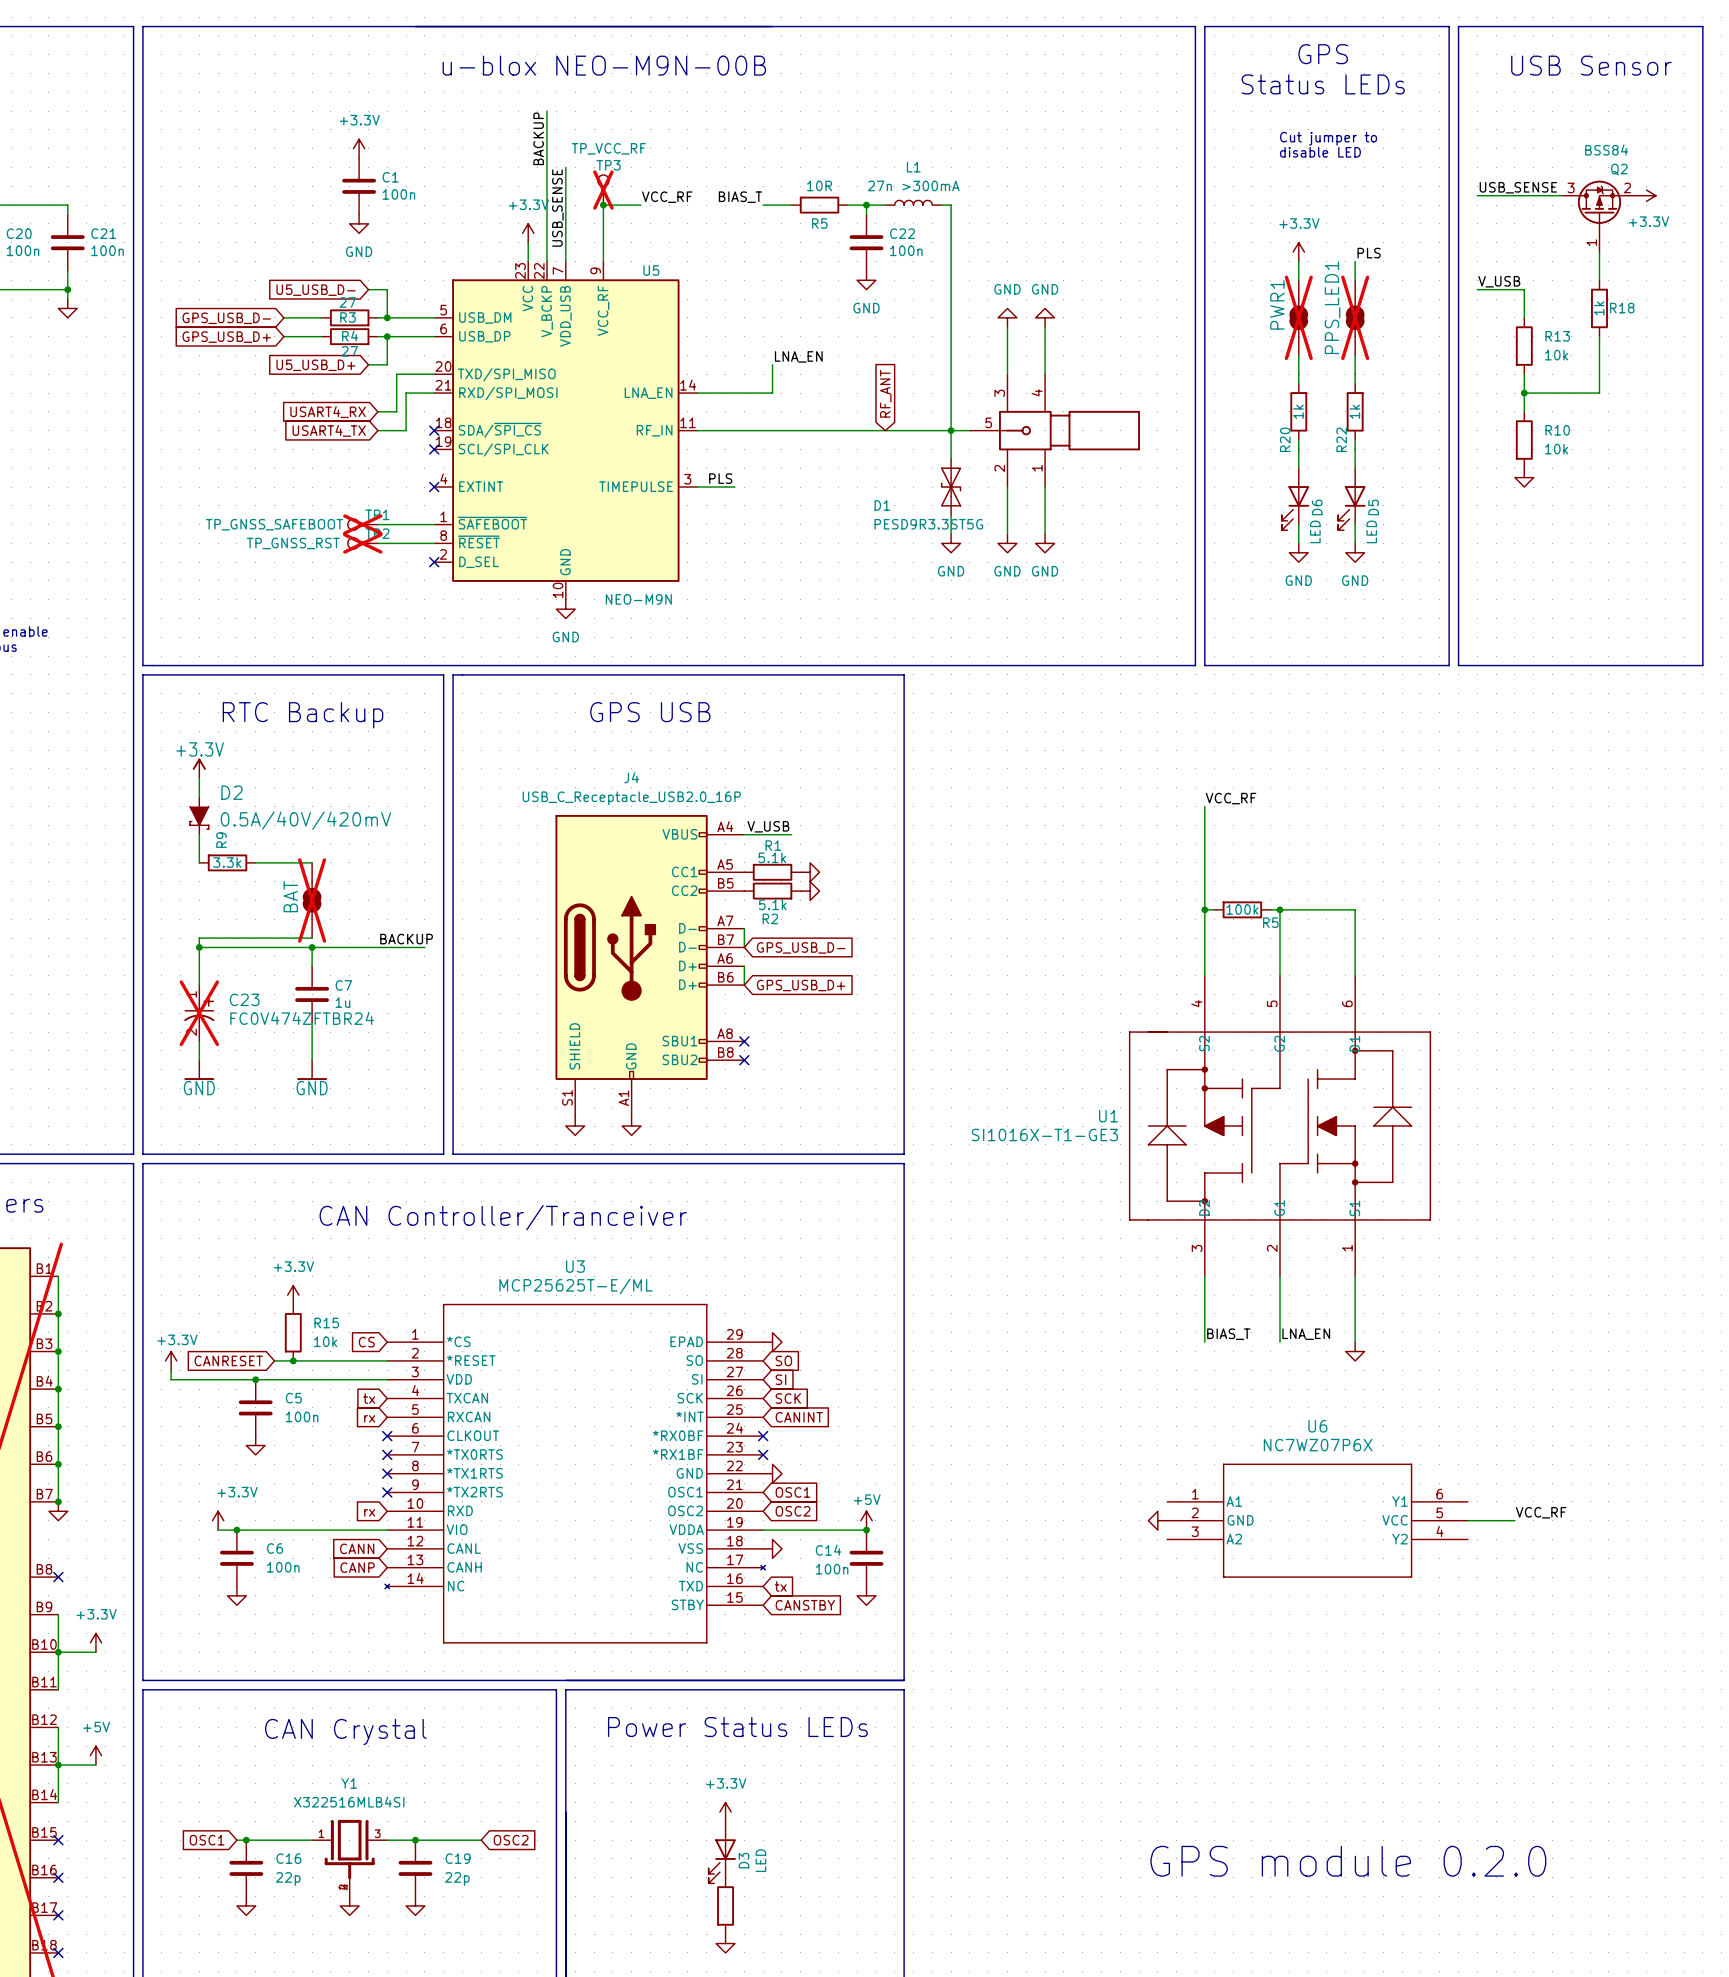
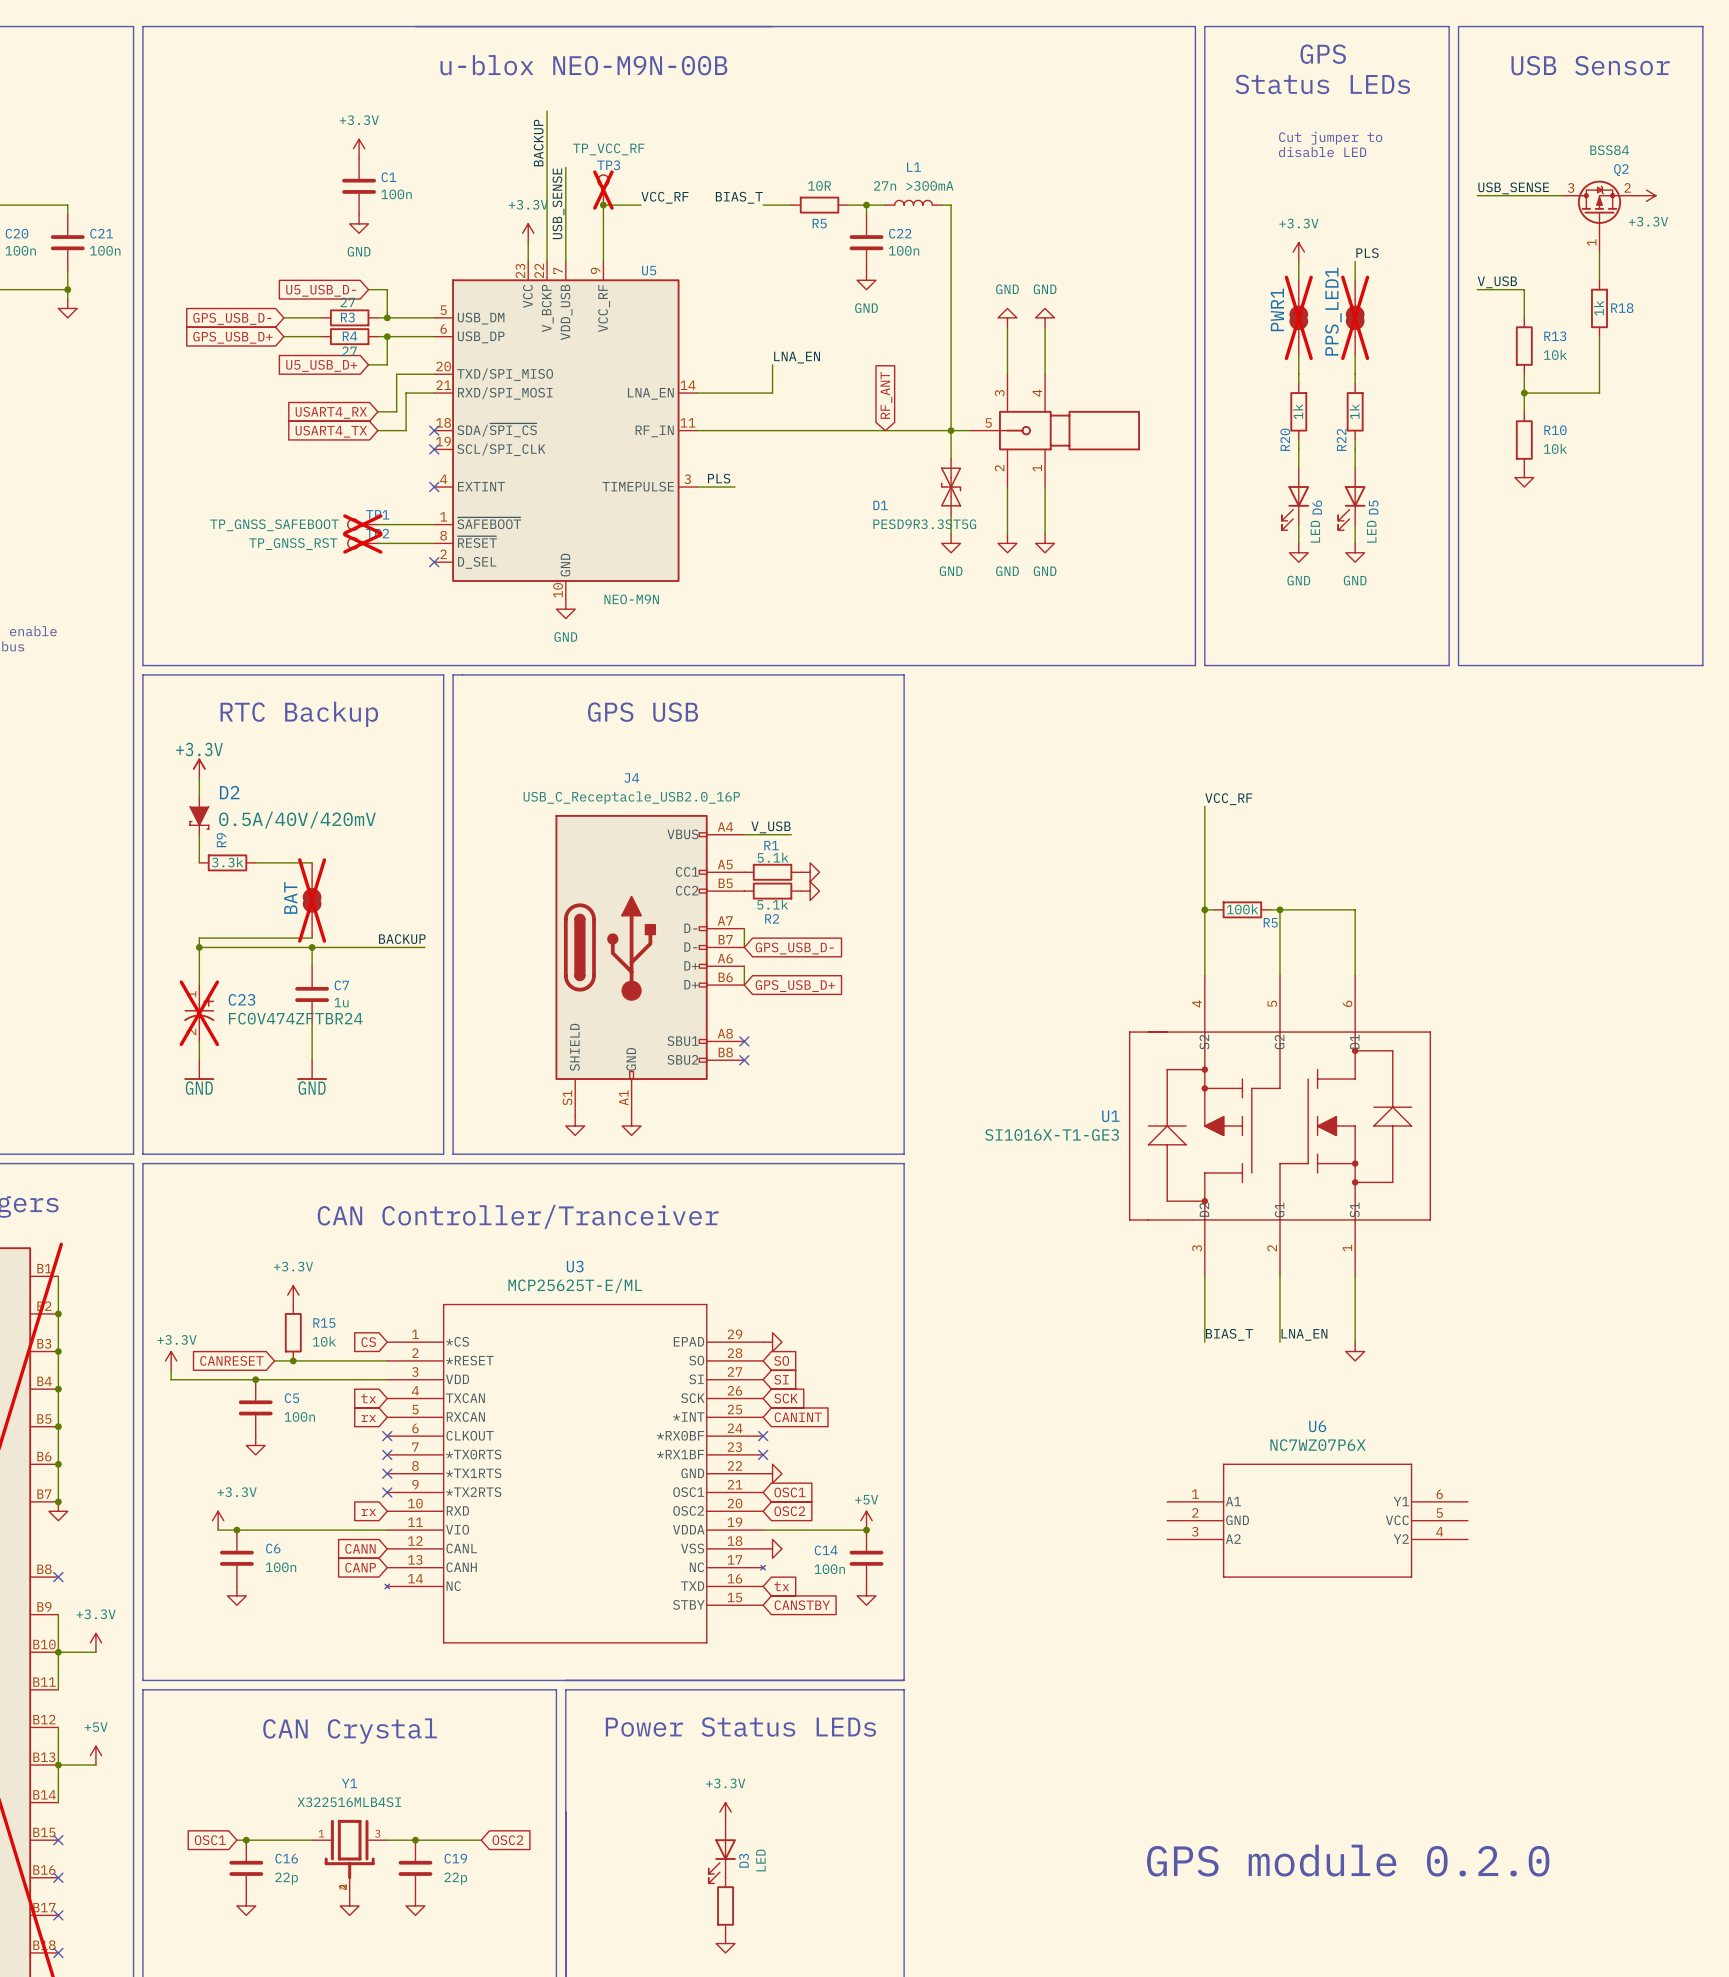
label: VCC_RF (1541, 1512) -> none
power symbol: (1157, 1520) -> none
wire: (1467, 1520) (1514, 1520) -> none

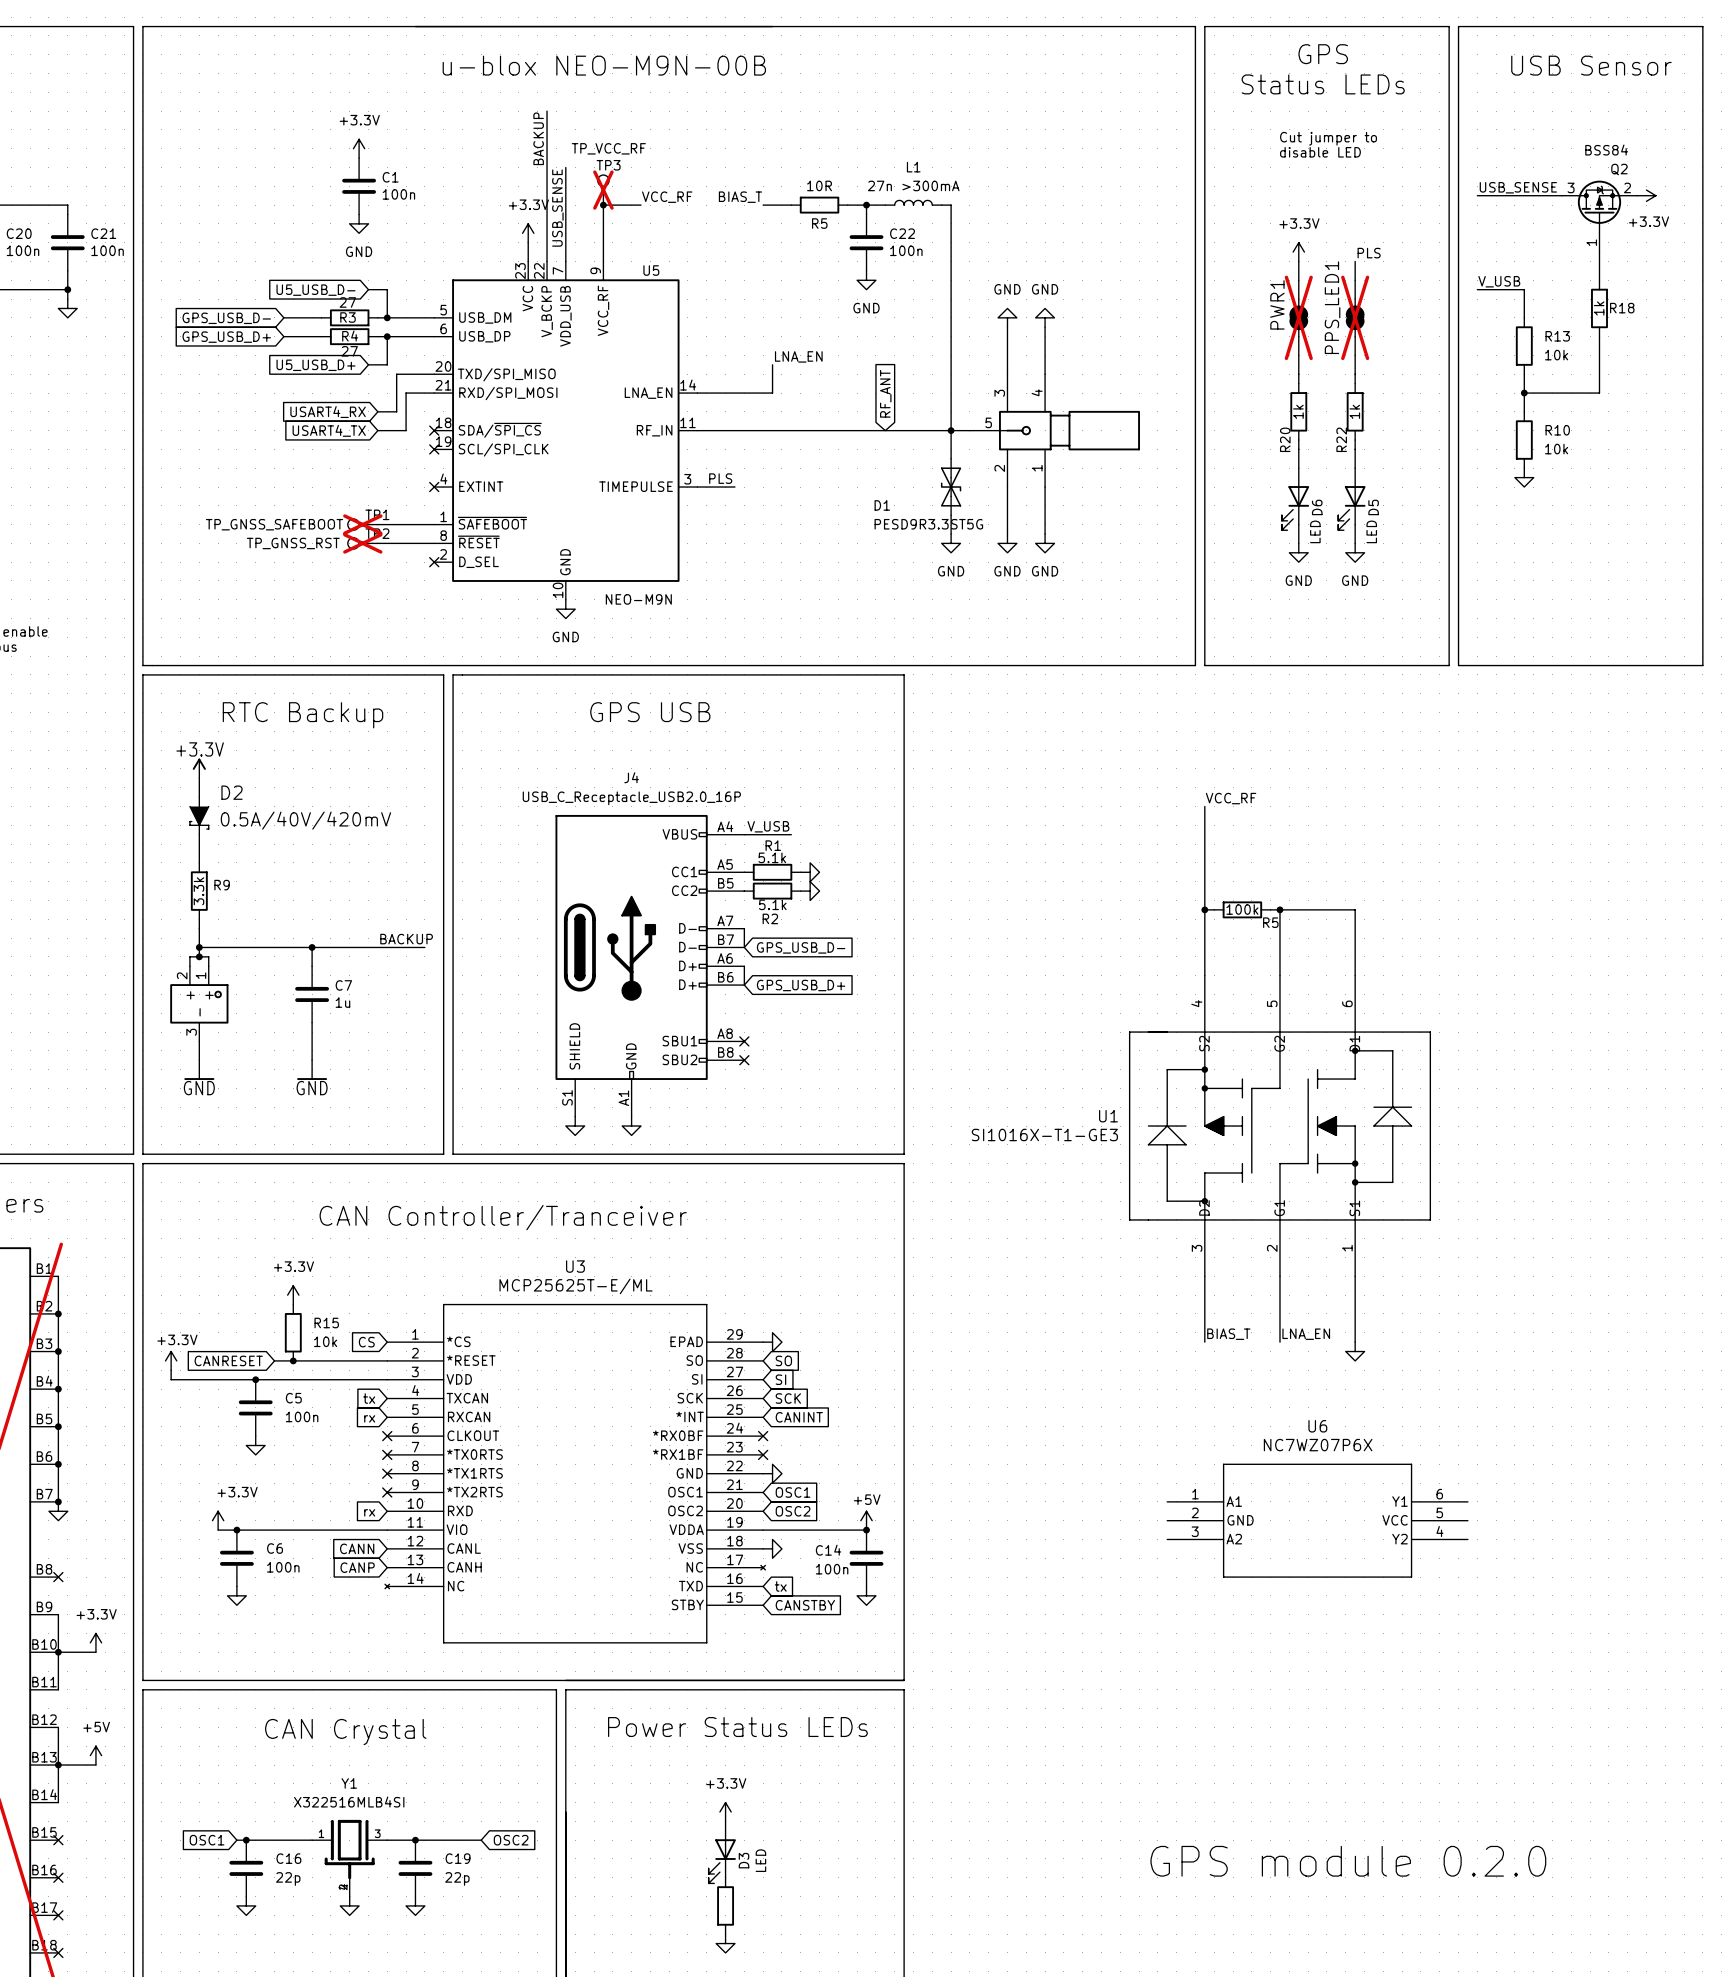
R9 rotation: 0° (227, 862) -> 90° clockwise (199, 891)
R9 position: (227, 862) -> (199, 891)
wire: (255, 862) (312, 862) -> none
BAT: (312, 900) -> none
wire: (199, 938) (312, 938) -> (199, 938) (199, 919)
wire: (199, 956) (199, 985) -> none
junction: none -> (199, 956)
wire: none -> (189, 966) (189, 956) (208, 956) (208, 966)
part: none -> (199, 1003)
C23: FC0V474ZFTBR24 (199, 1013) -> none

